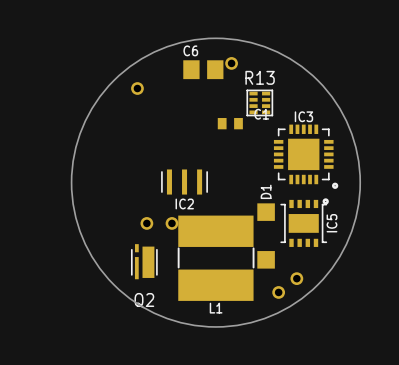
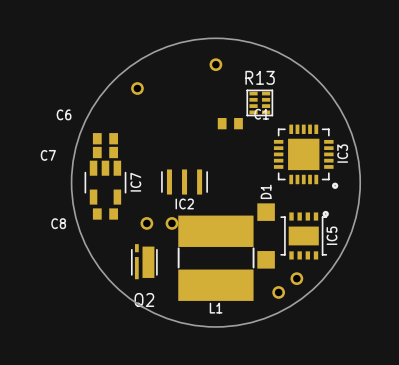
C6 name position: C6 (190, 50) -> C6 (64, 114)
C6 footprint: [183, 60, 224, 80] -> [92, 133, 119, 145]
part position: (231, 63) -> (215, 64)
IC3 name rotation: 0° (303, 116) -> 90° counterclockwise (342, 153)
IC3 name position: IC3 (303, 116) -> IC3 (342, 153)
C7: none -> (105, 152)
IC7: none -> (105, 182)
C8: none -> (105, 214)
IC5 position: (304, 222) -> (304, 235)

